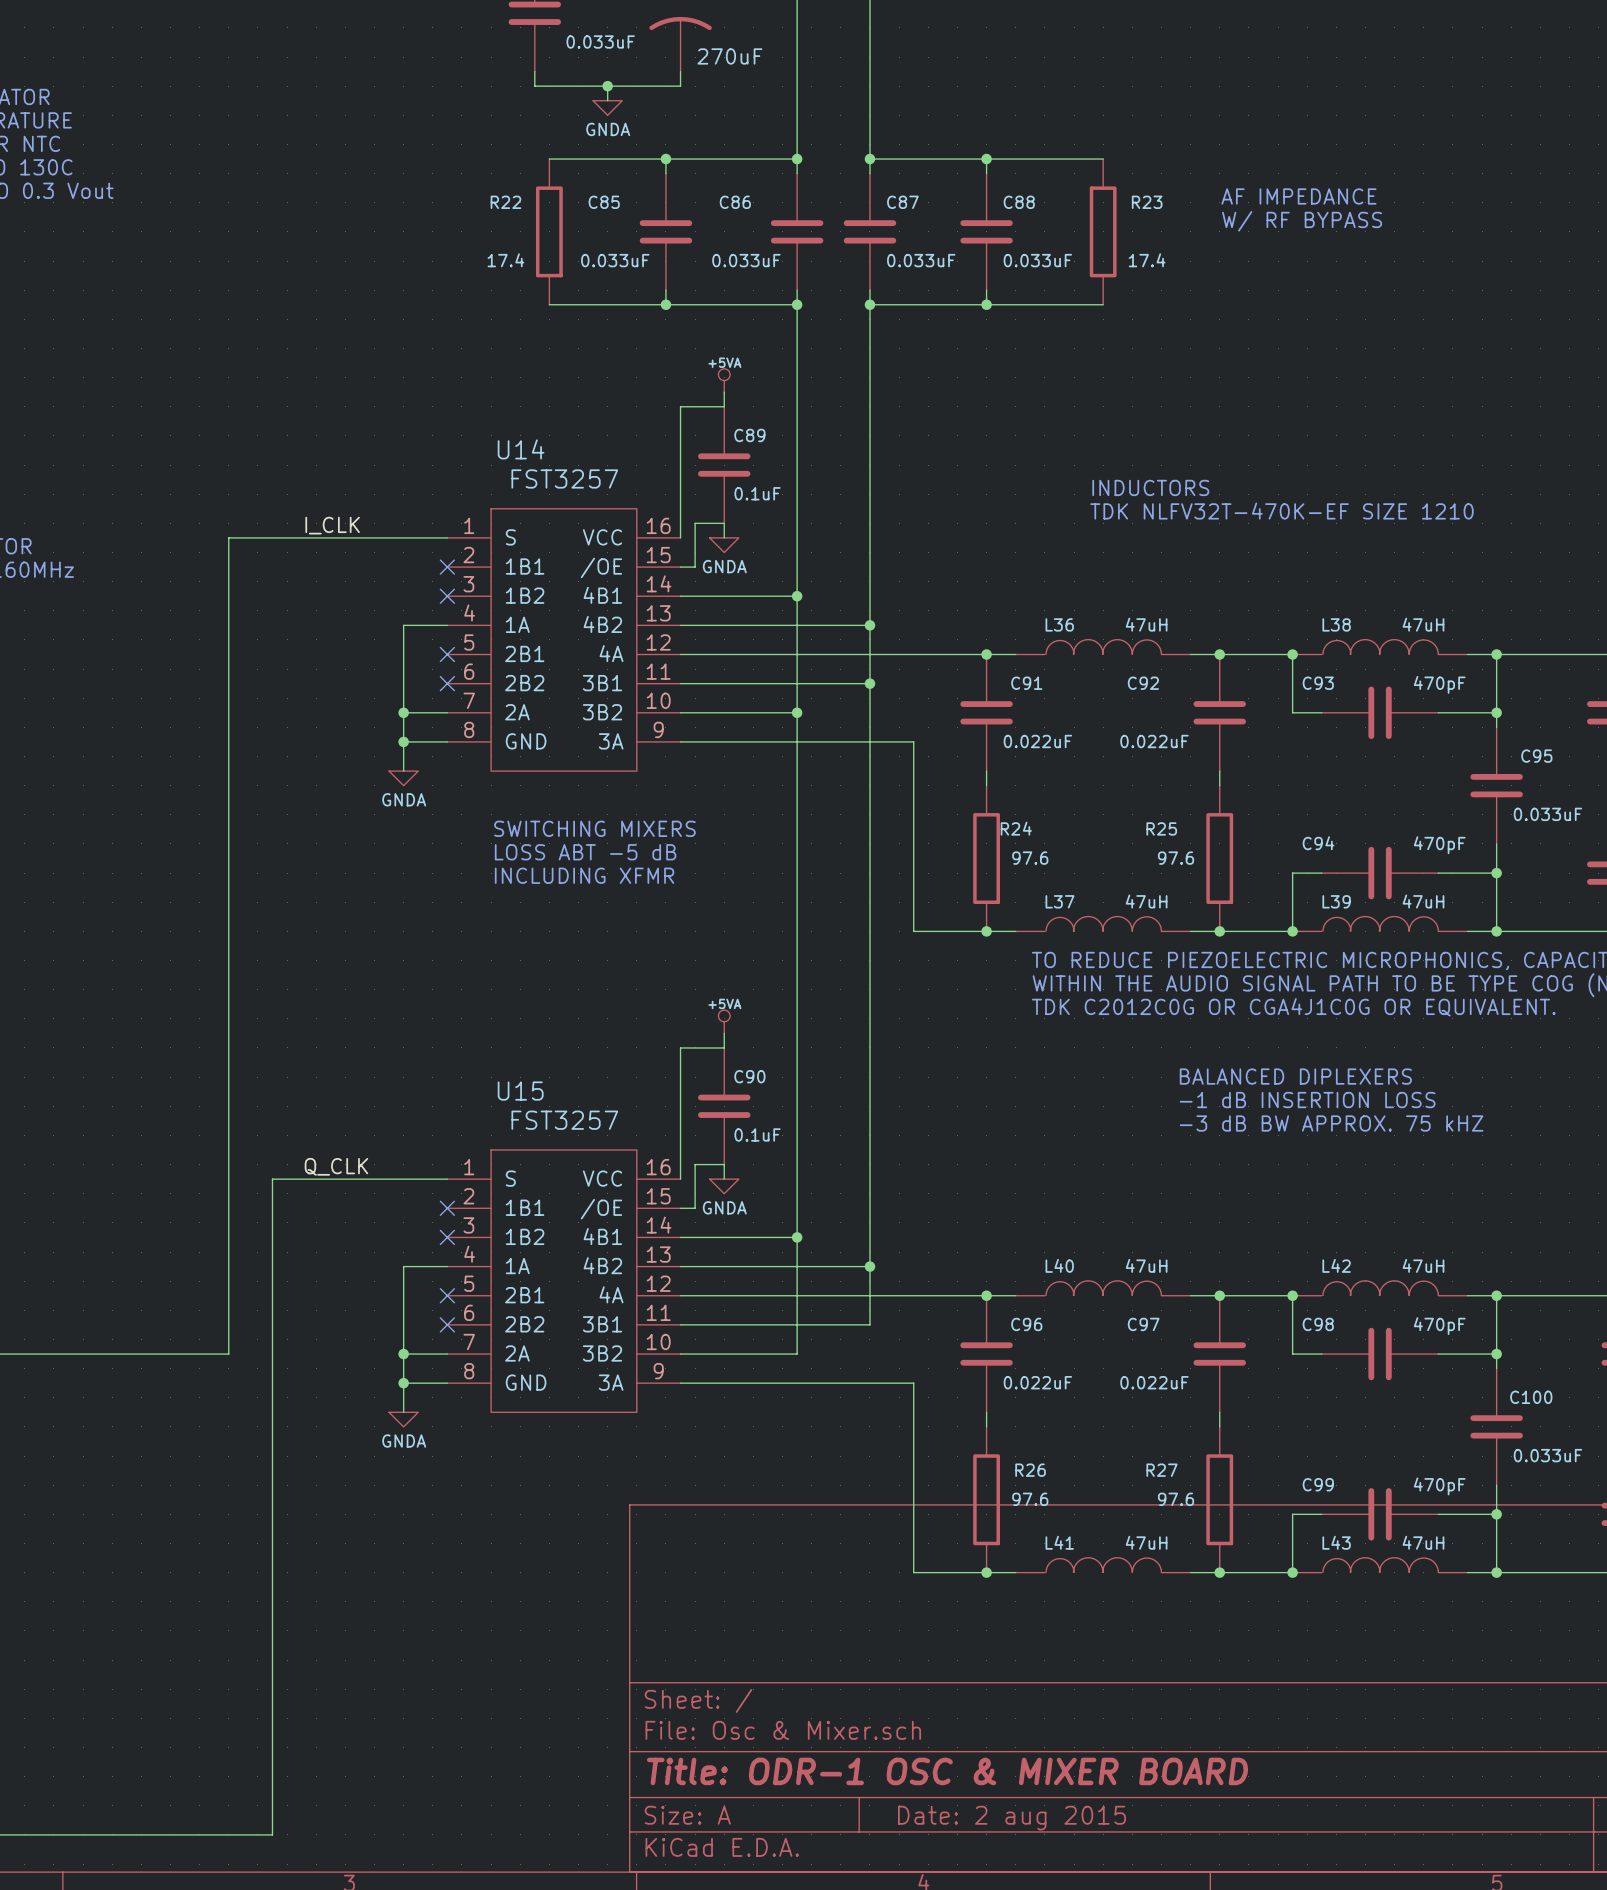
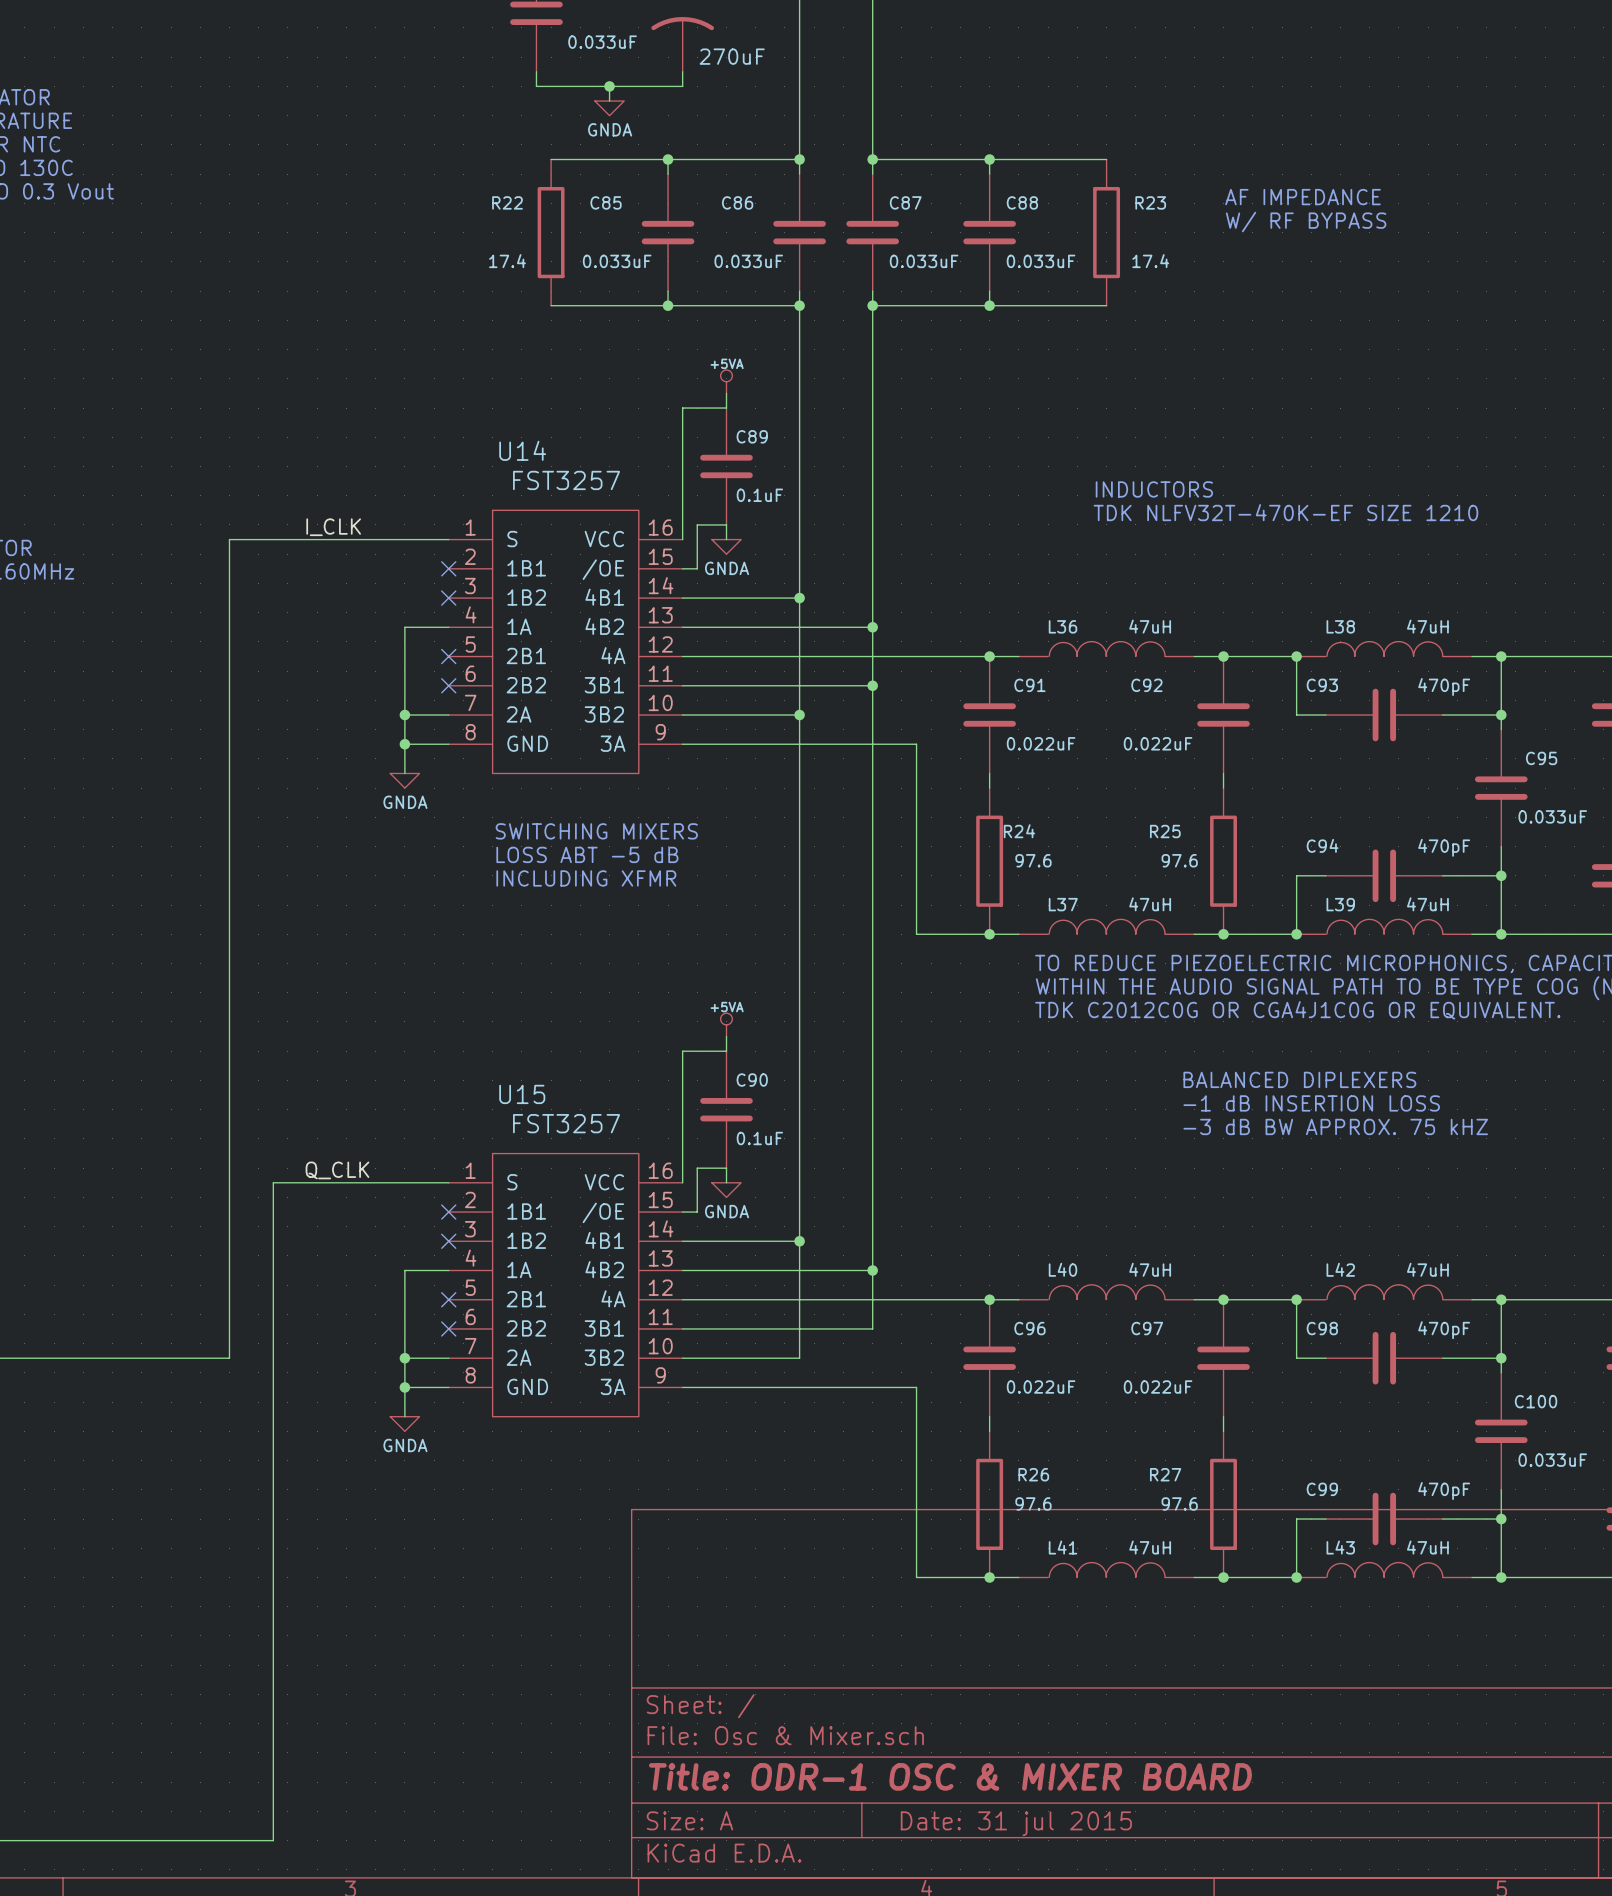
title block: Date: 2 aug 2015 (1011, 1818) -> Date: 31 jul 2015 (1016, 1823)

